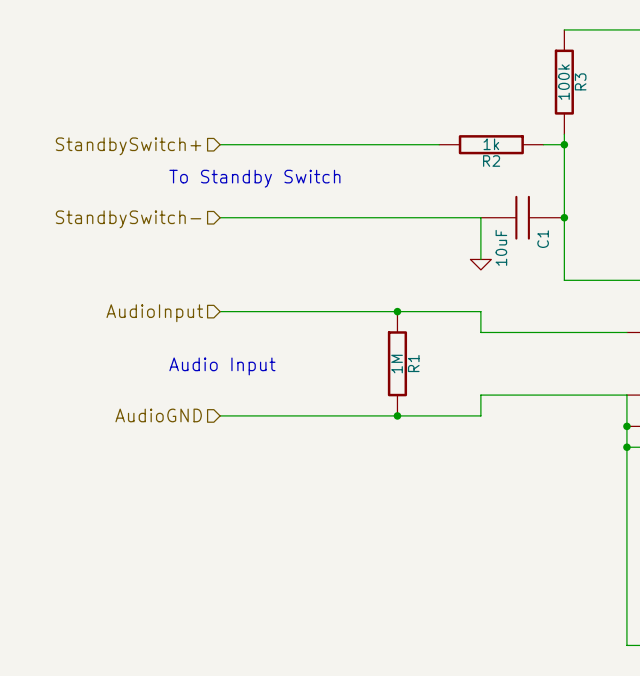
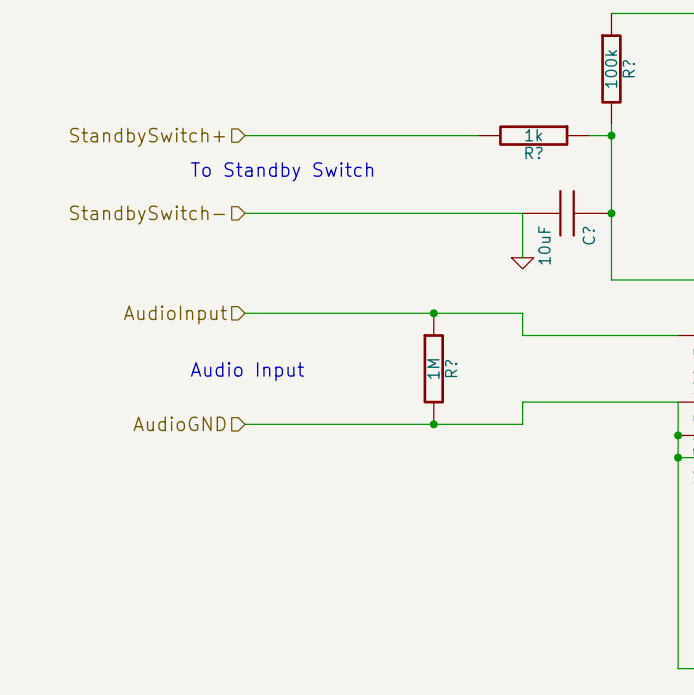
R3 name: R3 (580, 81) -> R? (628, 68)
R2 name: R2 (491, 161) -> R? (533, 152)
C1 name: C1 (543, 239) -> C? (588, 235)
R1 name: R1 (413, 363) -> R? (451, 368)

